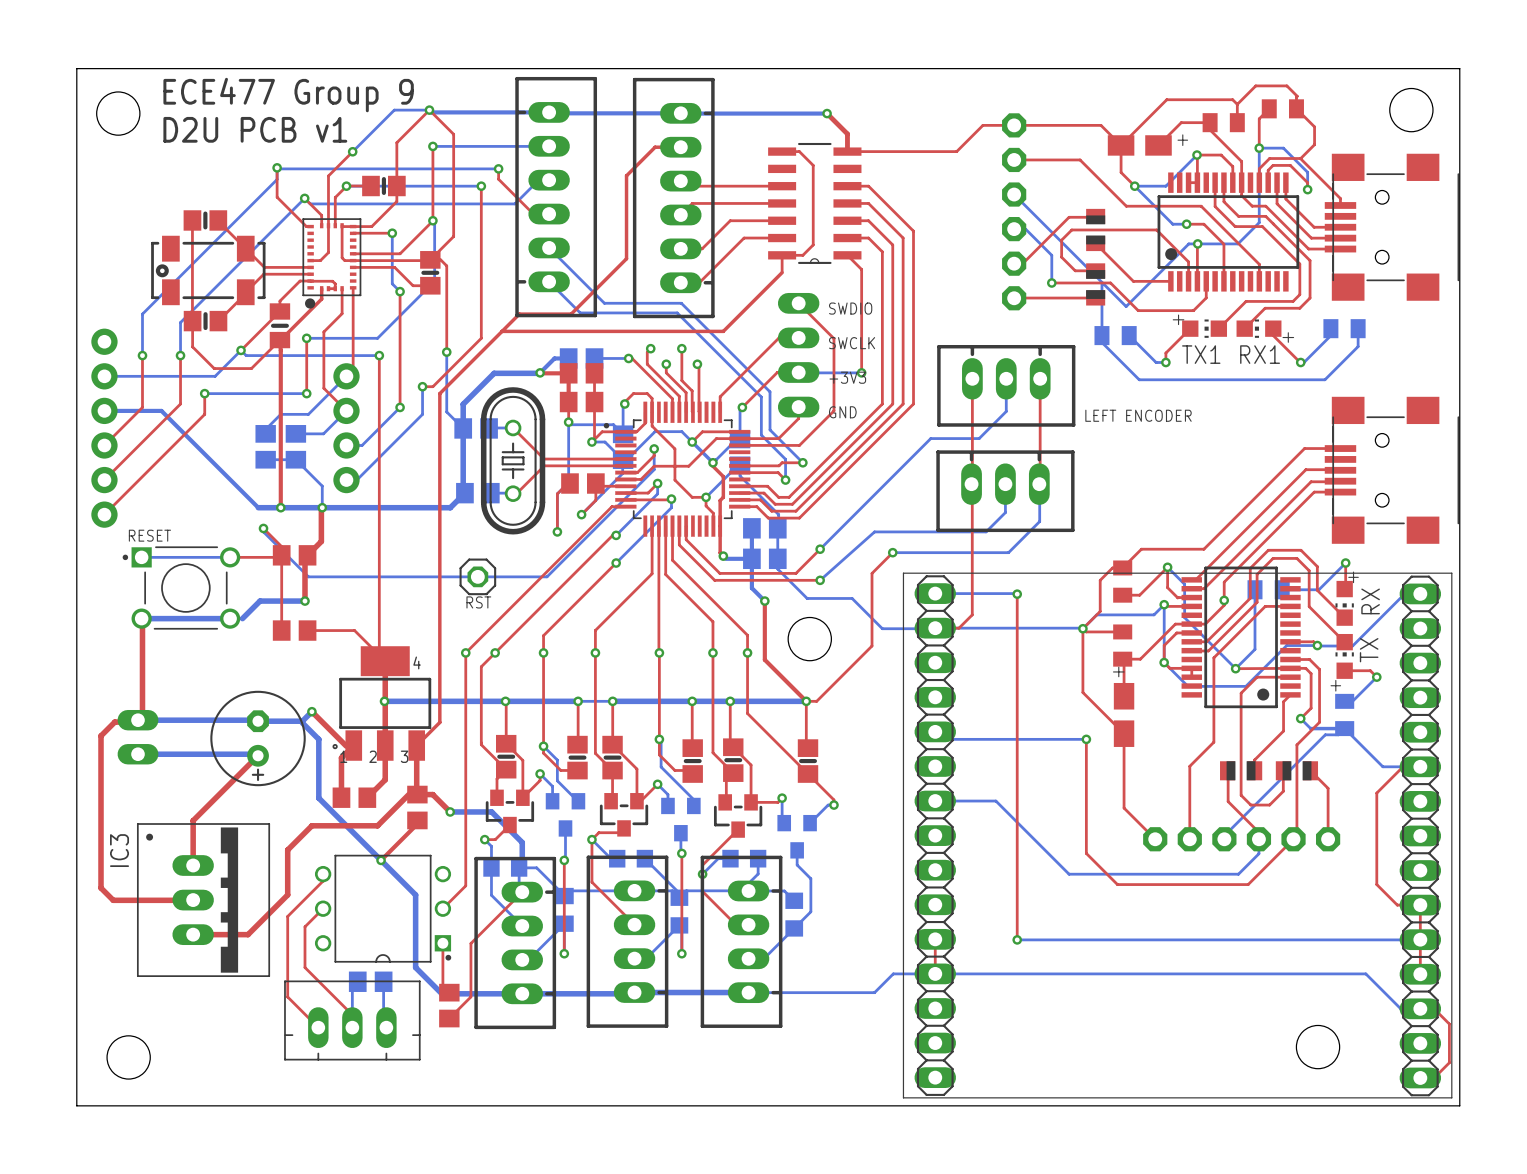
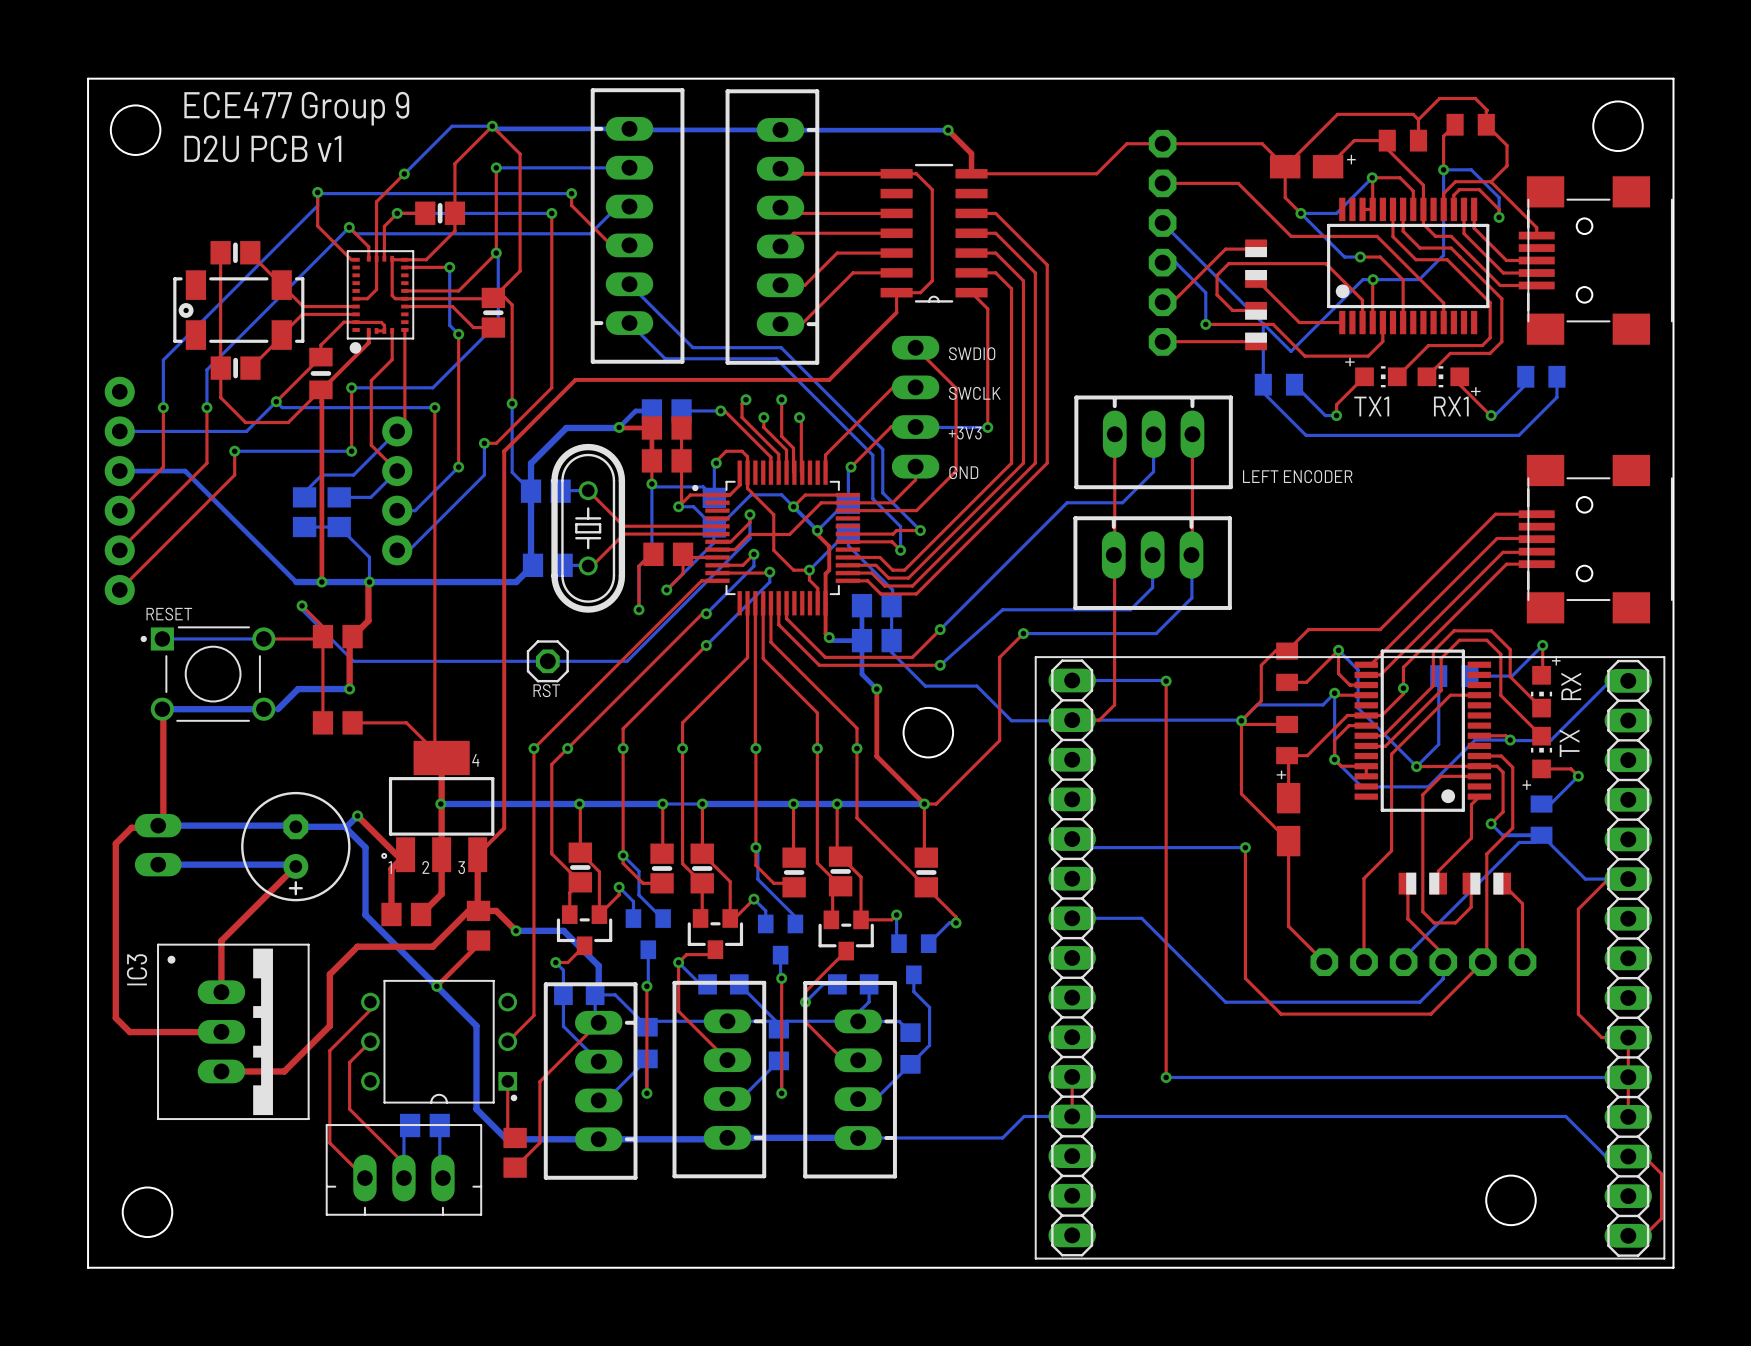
top track: (680, 147) (655, 147) (626, 175) (626, 258) (571, 314) (519, 314) (502, 331) -> (780, 168) (785, 173) (896, 173)

